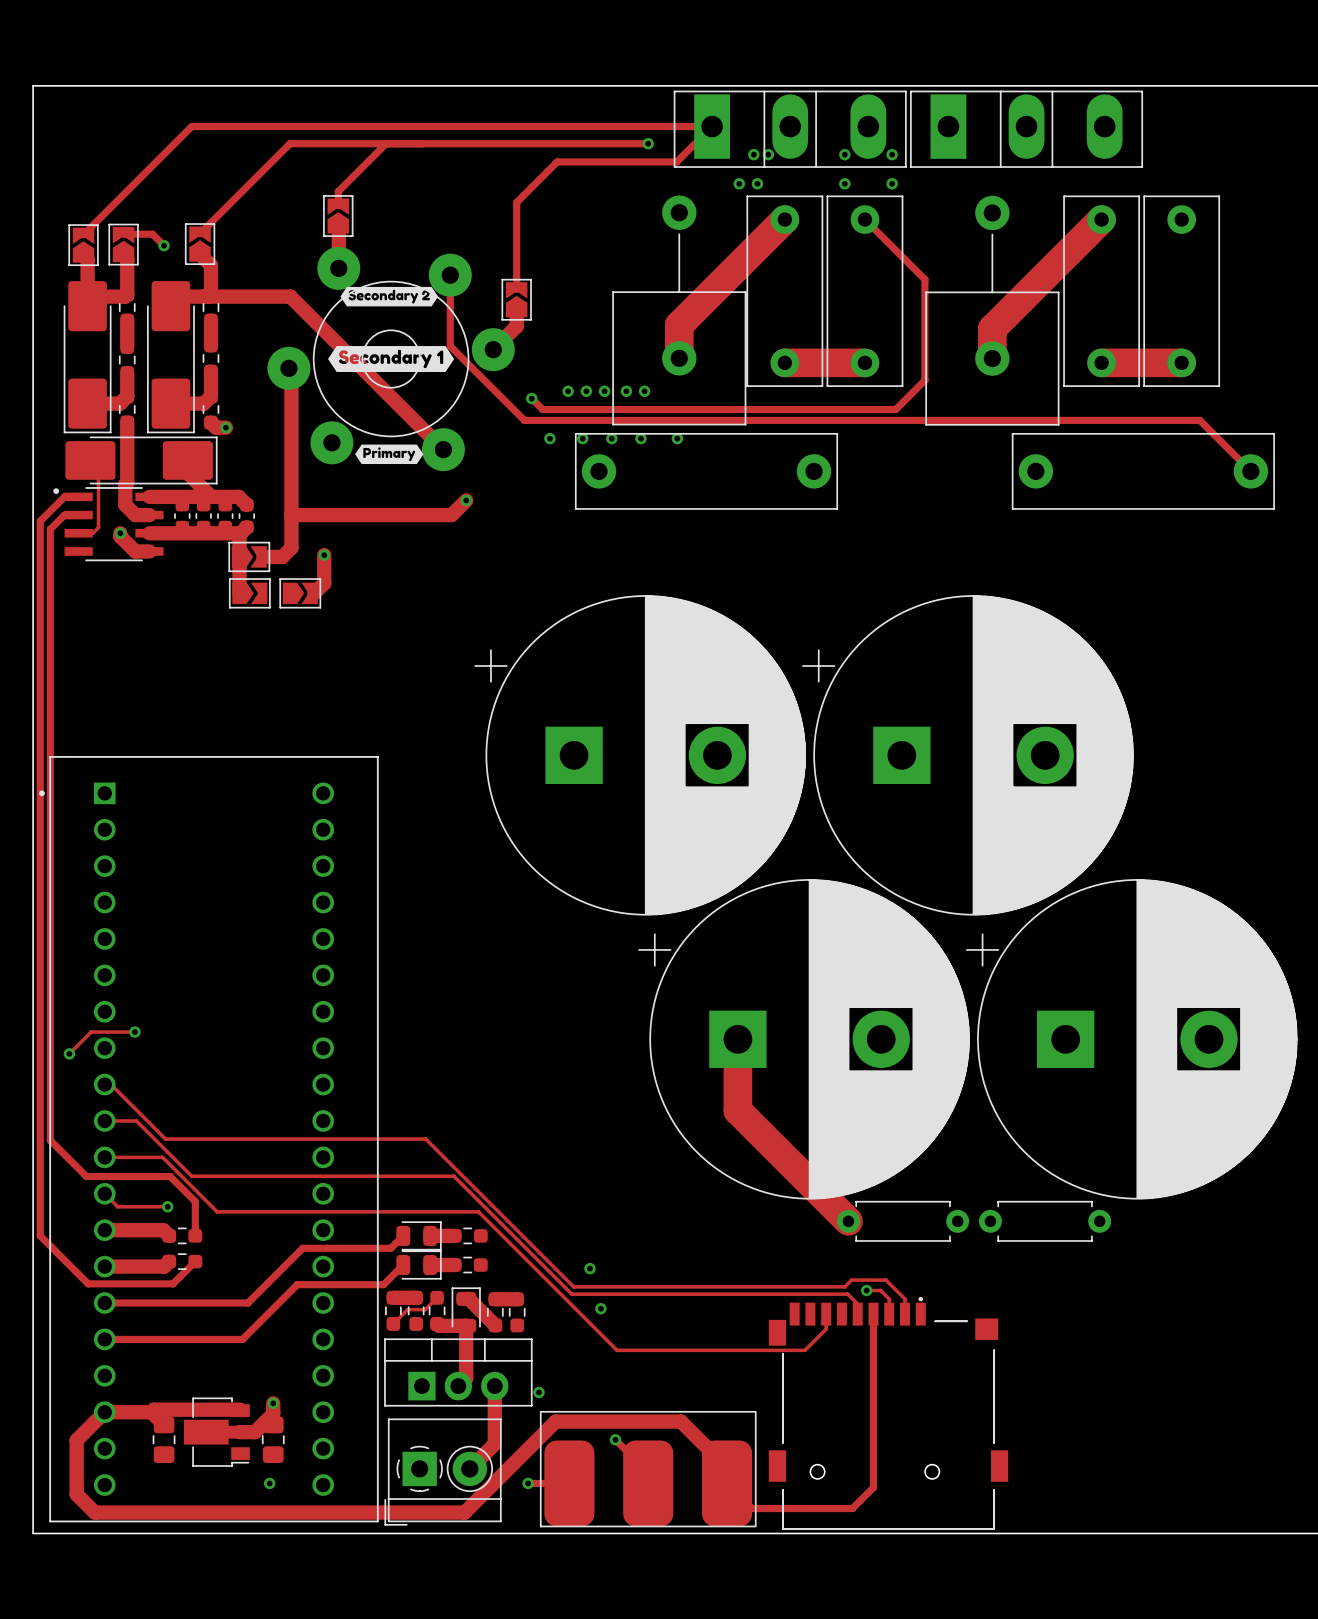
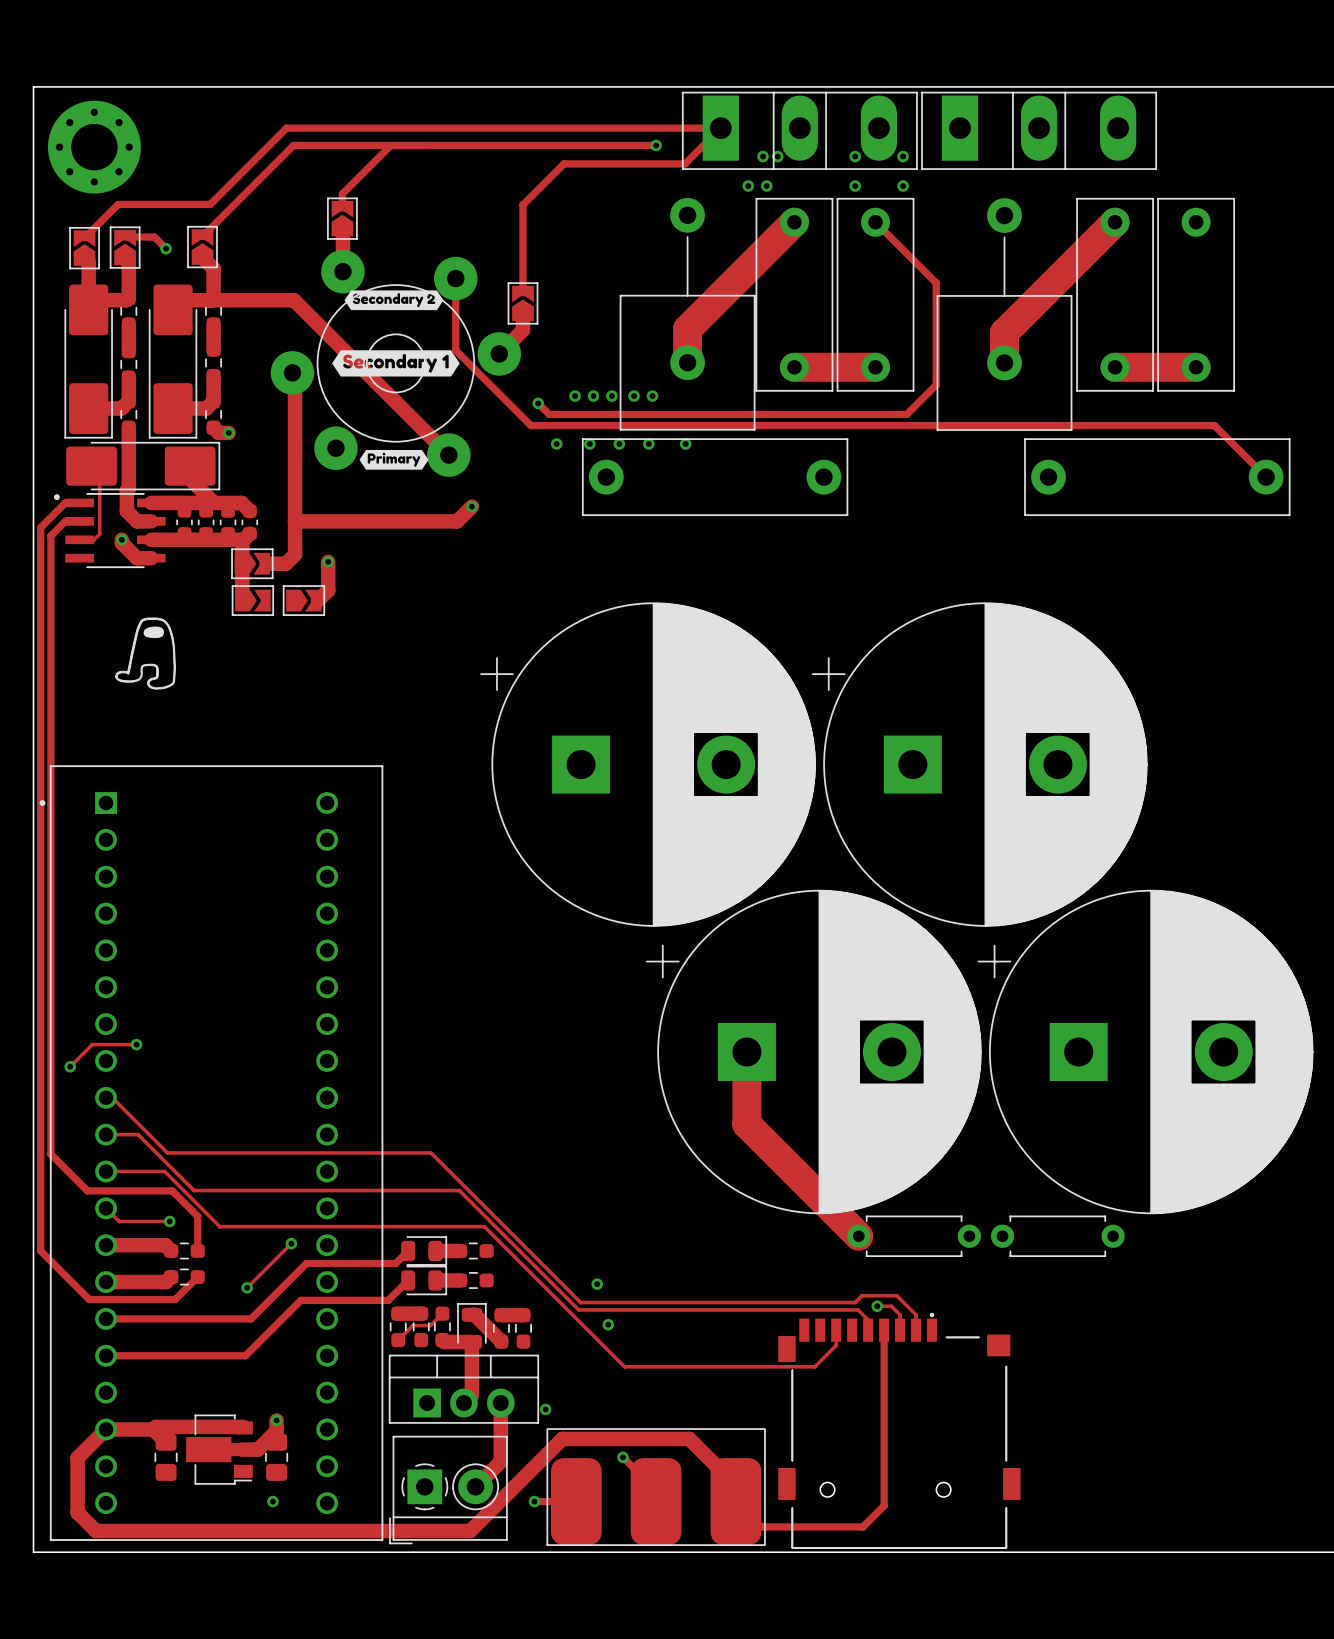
track: (283, 126) (191, 126) (83, 234) -> (286, 128) (210, 204) (118, 204) (84, 237)
part: none -> (94, 147)
drawing: none -> [115, 617, 176, 690]
track: none -> (291, 1243) (247, 1287)
via: none -> (291, 1243)
via: none -> (247, 1287)

